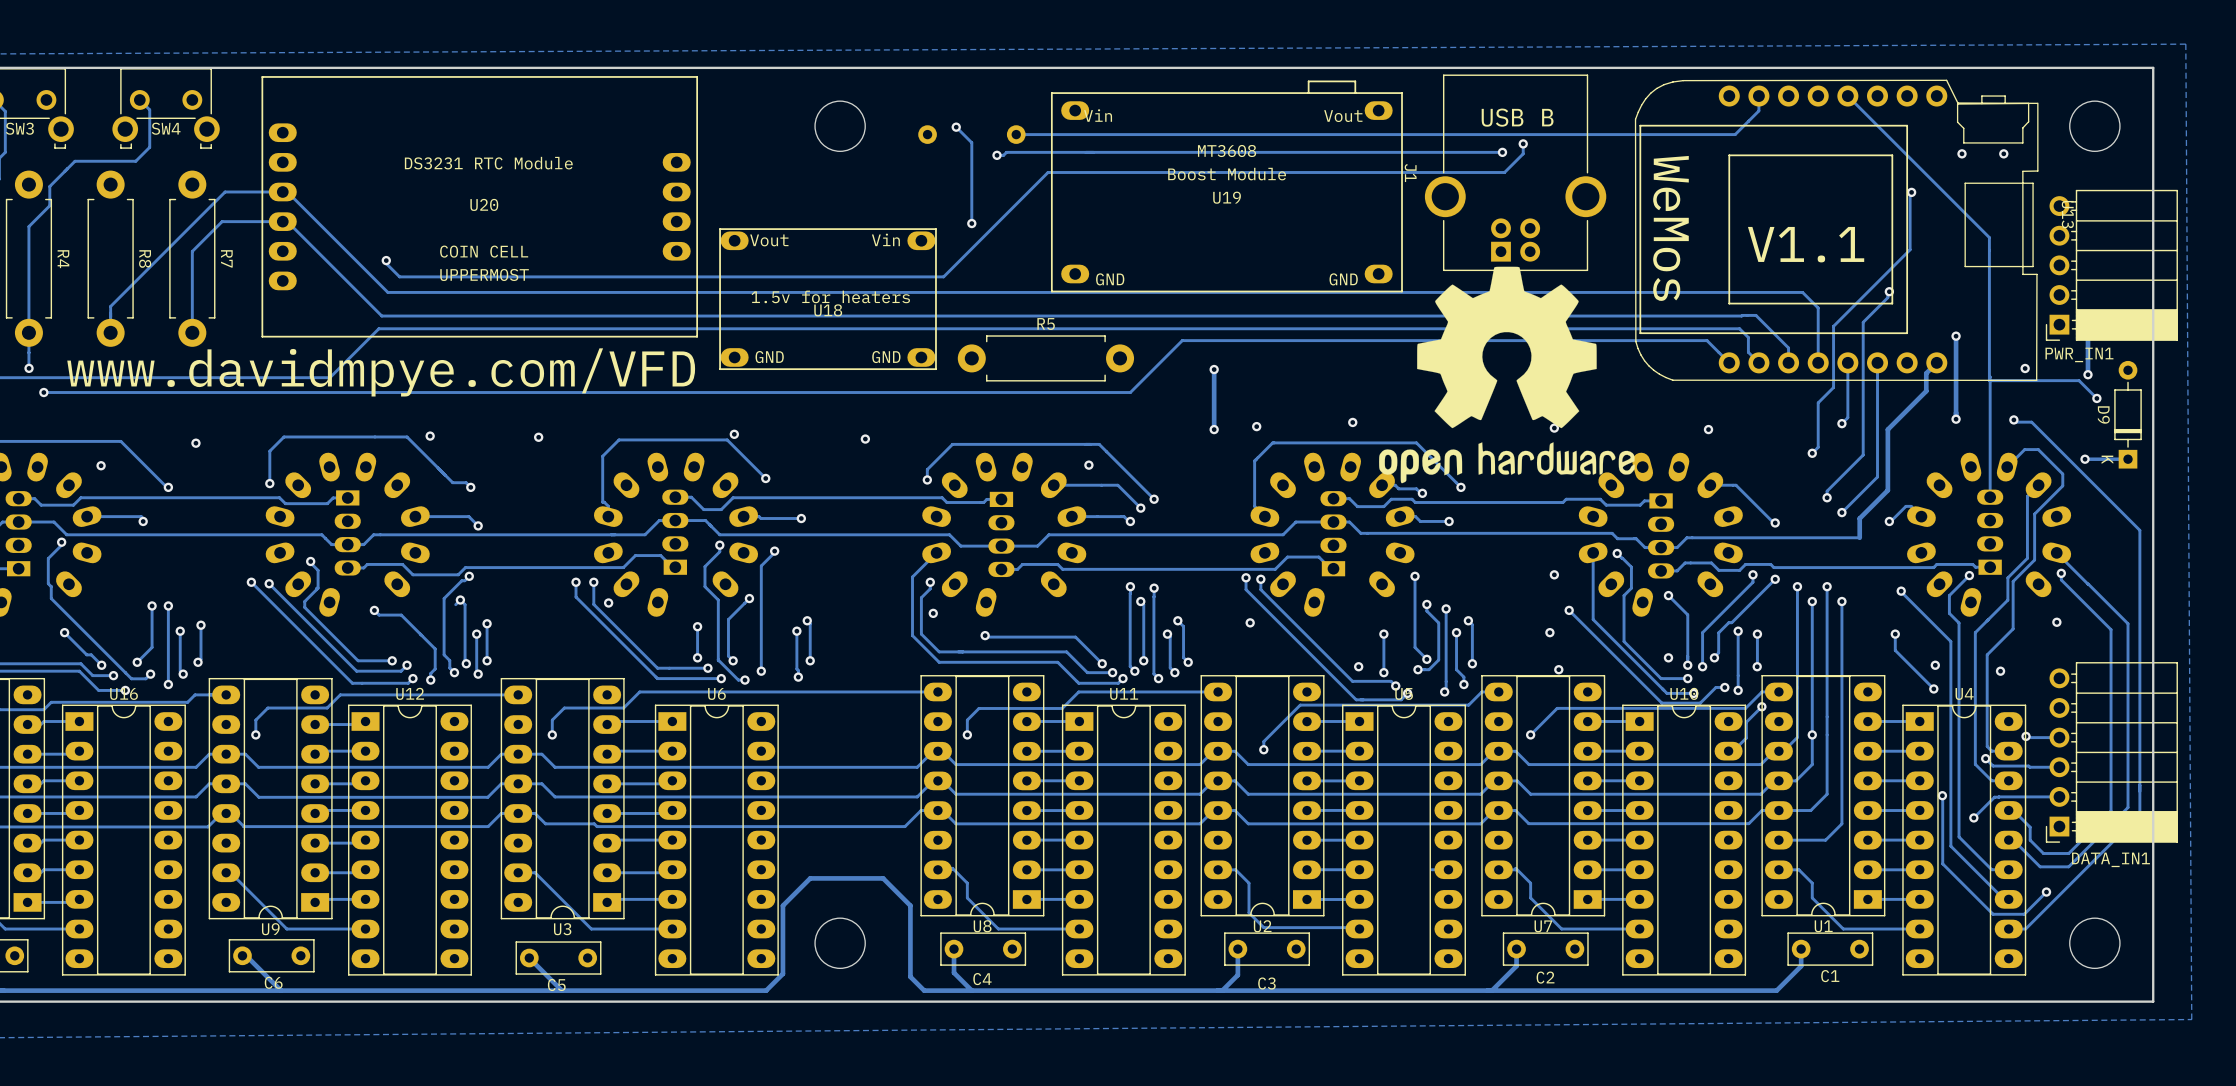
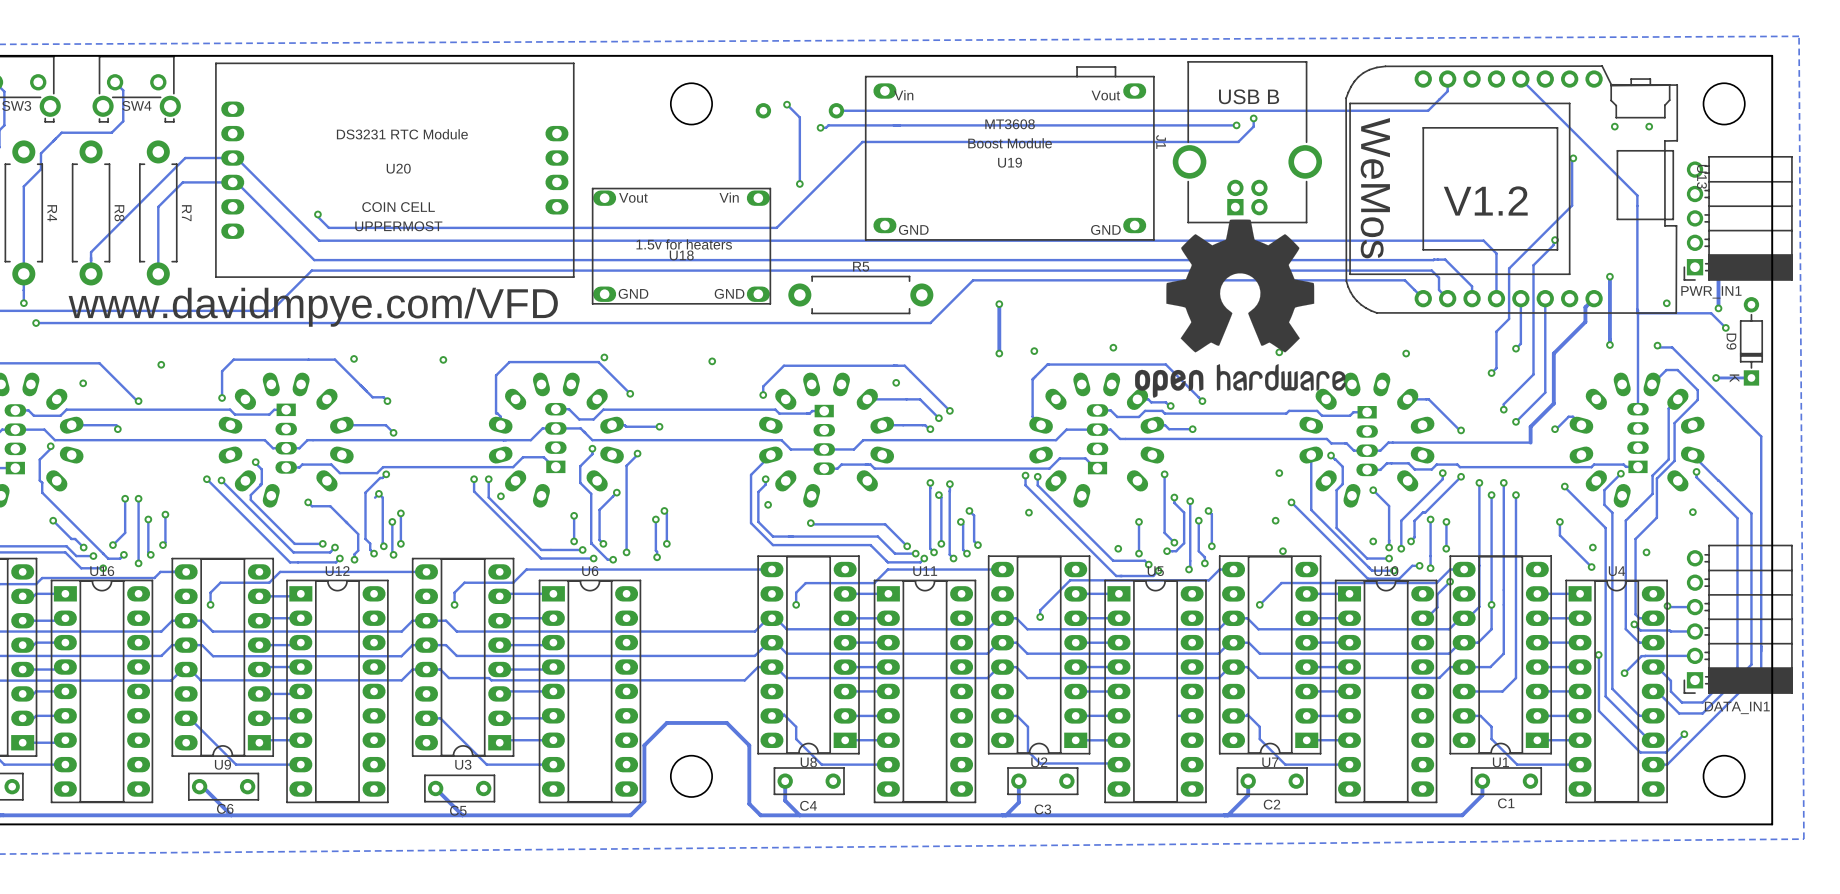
text: V1.1 (1806, 244) -> V1.2 (1485, 200)

